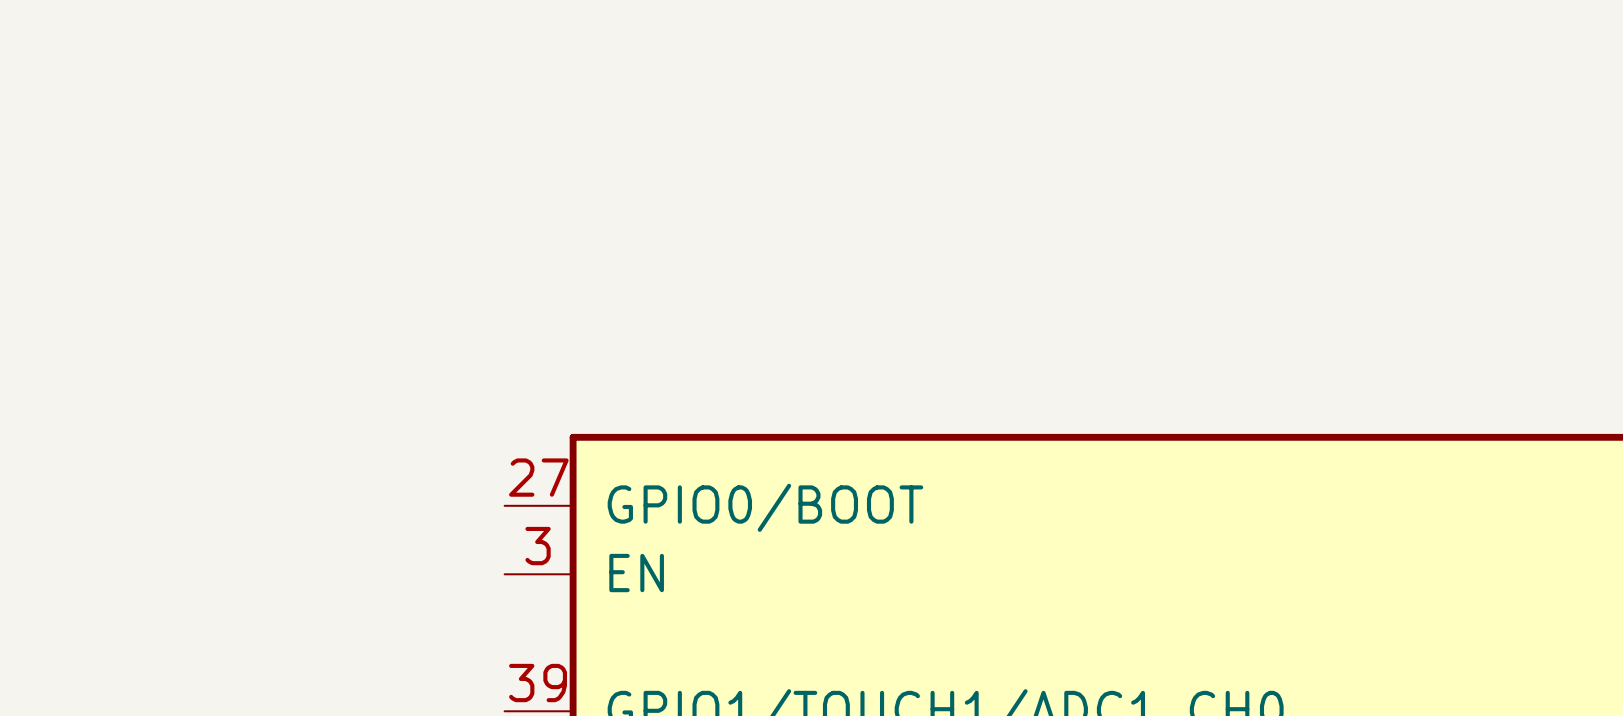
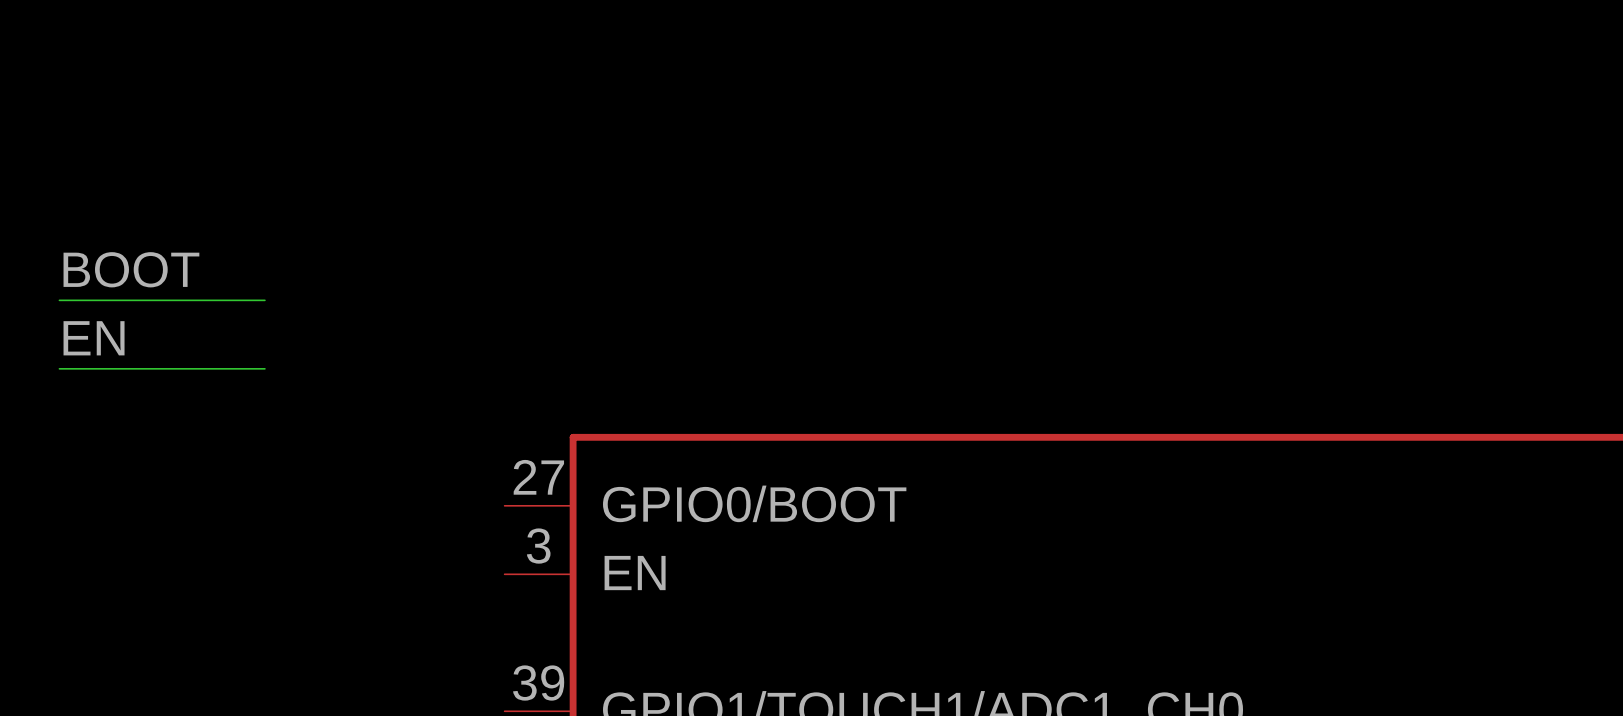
label: none -> BOOT (131, 269)
wire: none -> (59, 300) (264, 300)
label: none -> EN (94, 338)
wire: none -> (59, 368) (264, 368)

